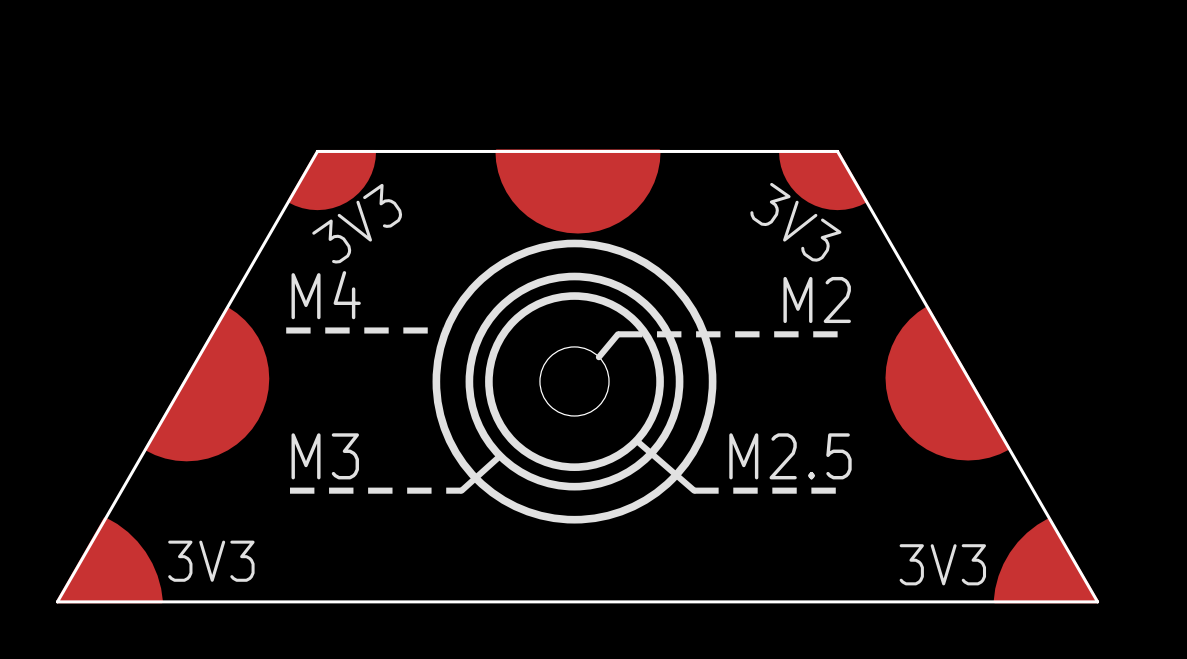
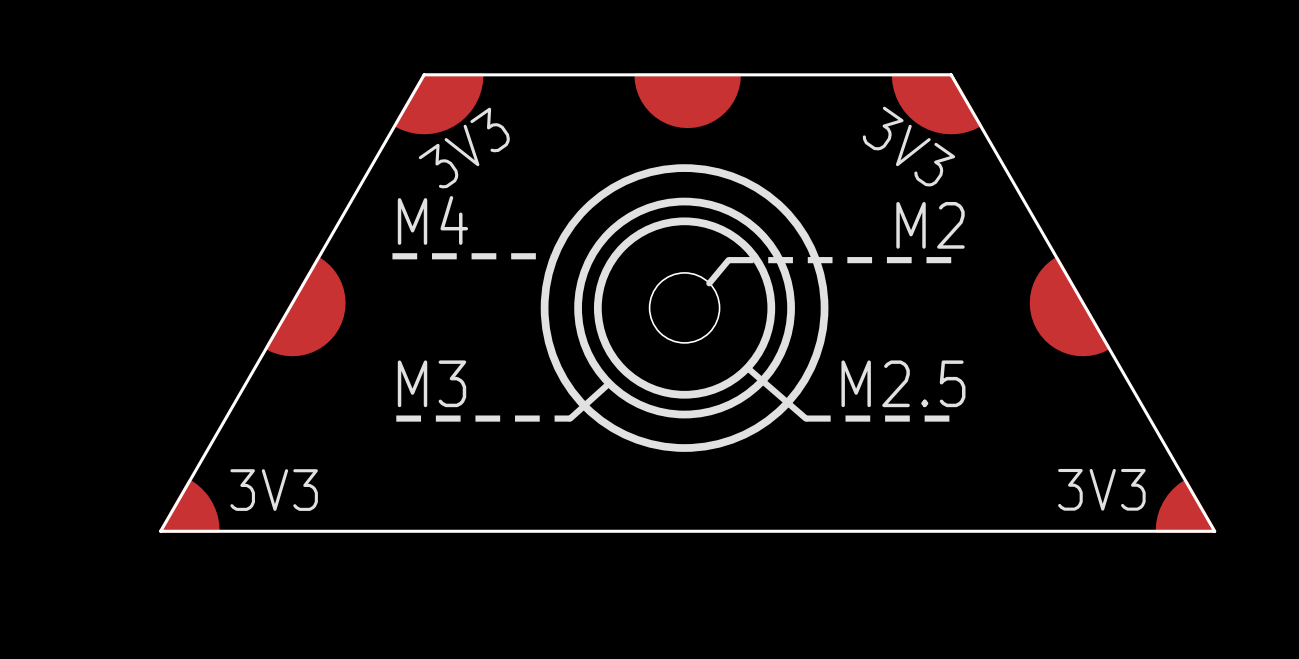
part footprint: [55, 149, 1100, 604] -> [159, 73, 1217, 533]
text position: 3V3 (211, 561) -> 3V3 (274, 490)
text position: 3V3 (942, 564) -> 3V3 (1101, 489)

